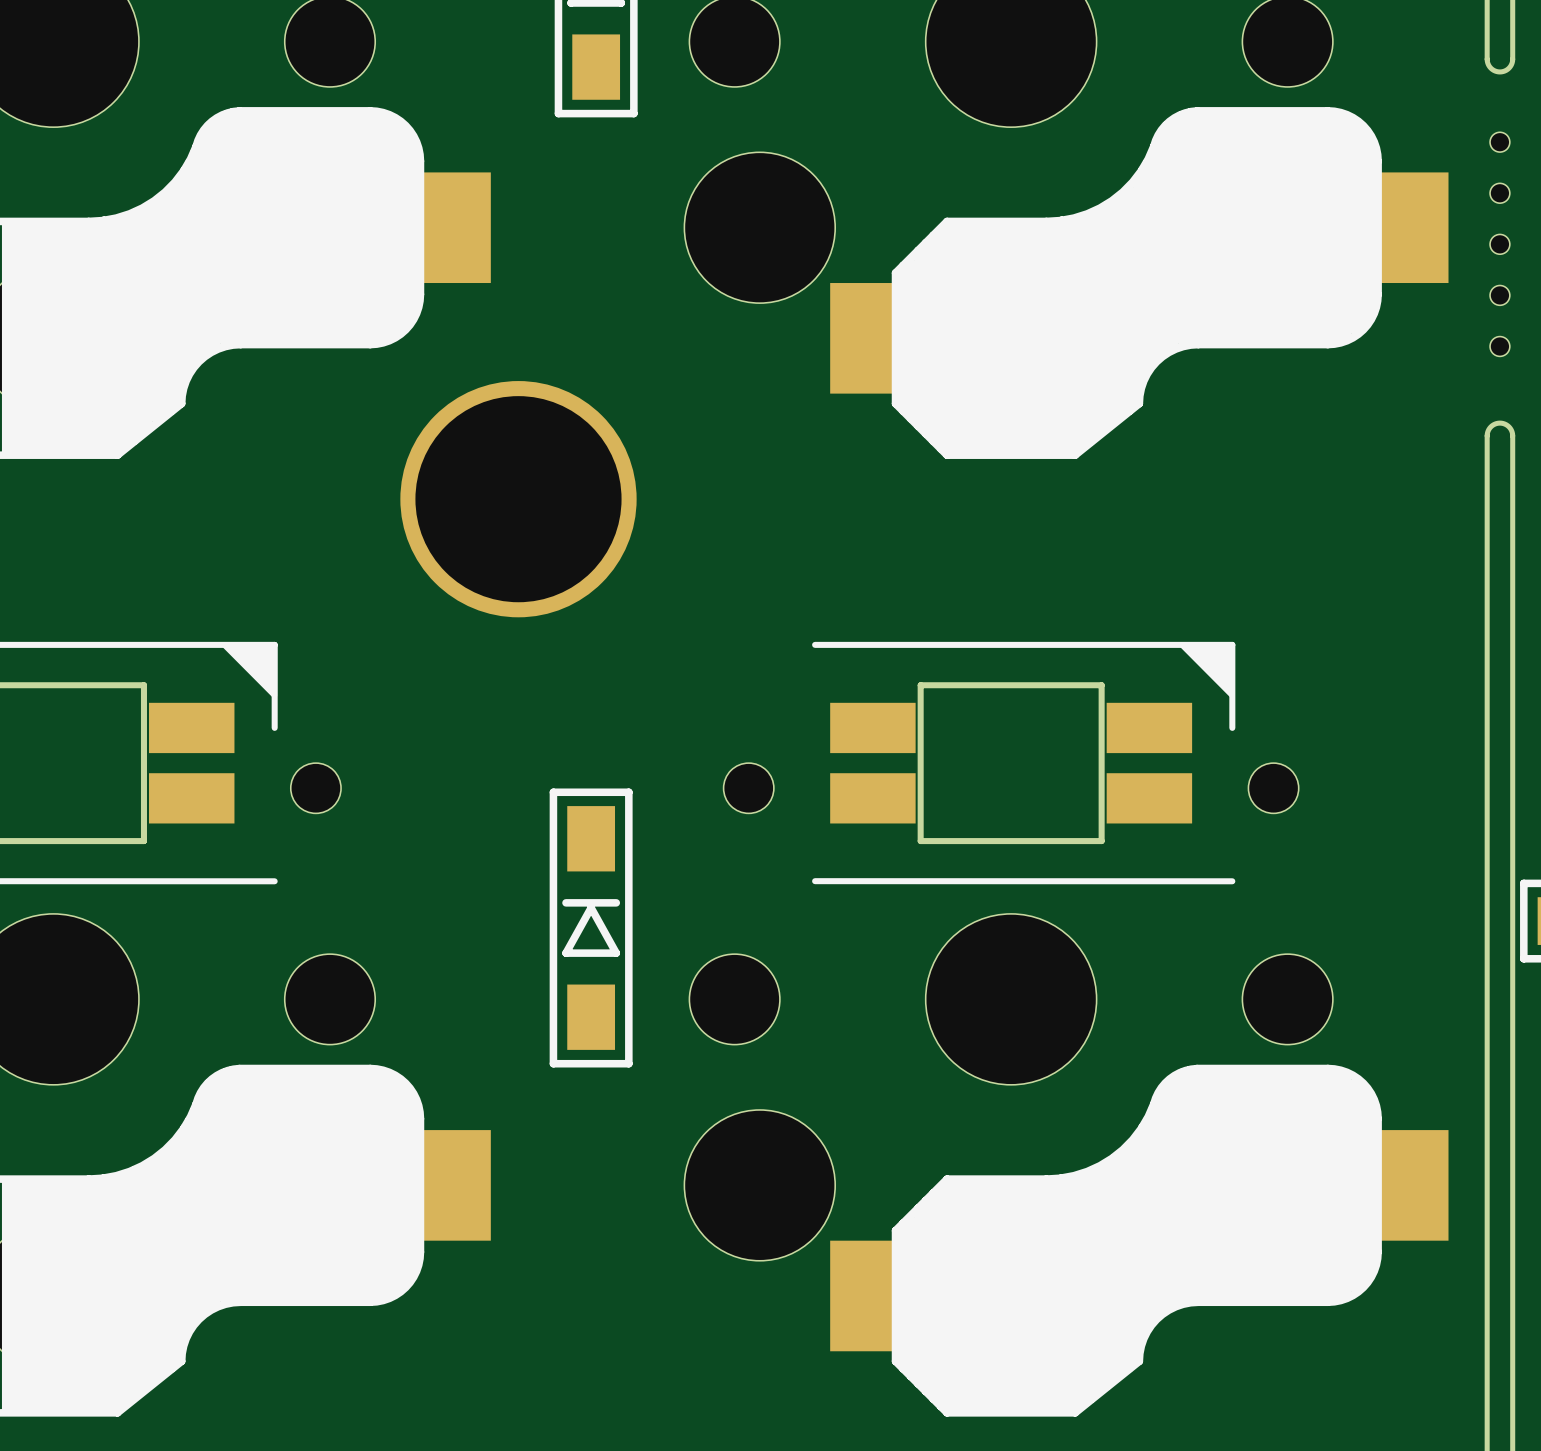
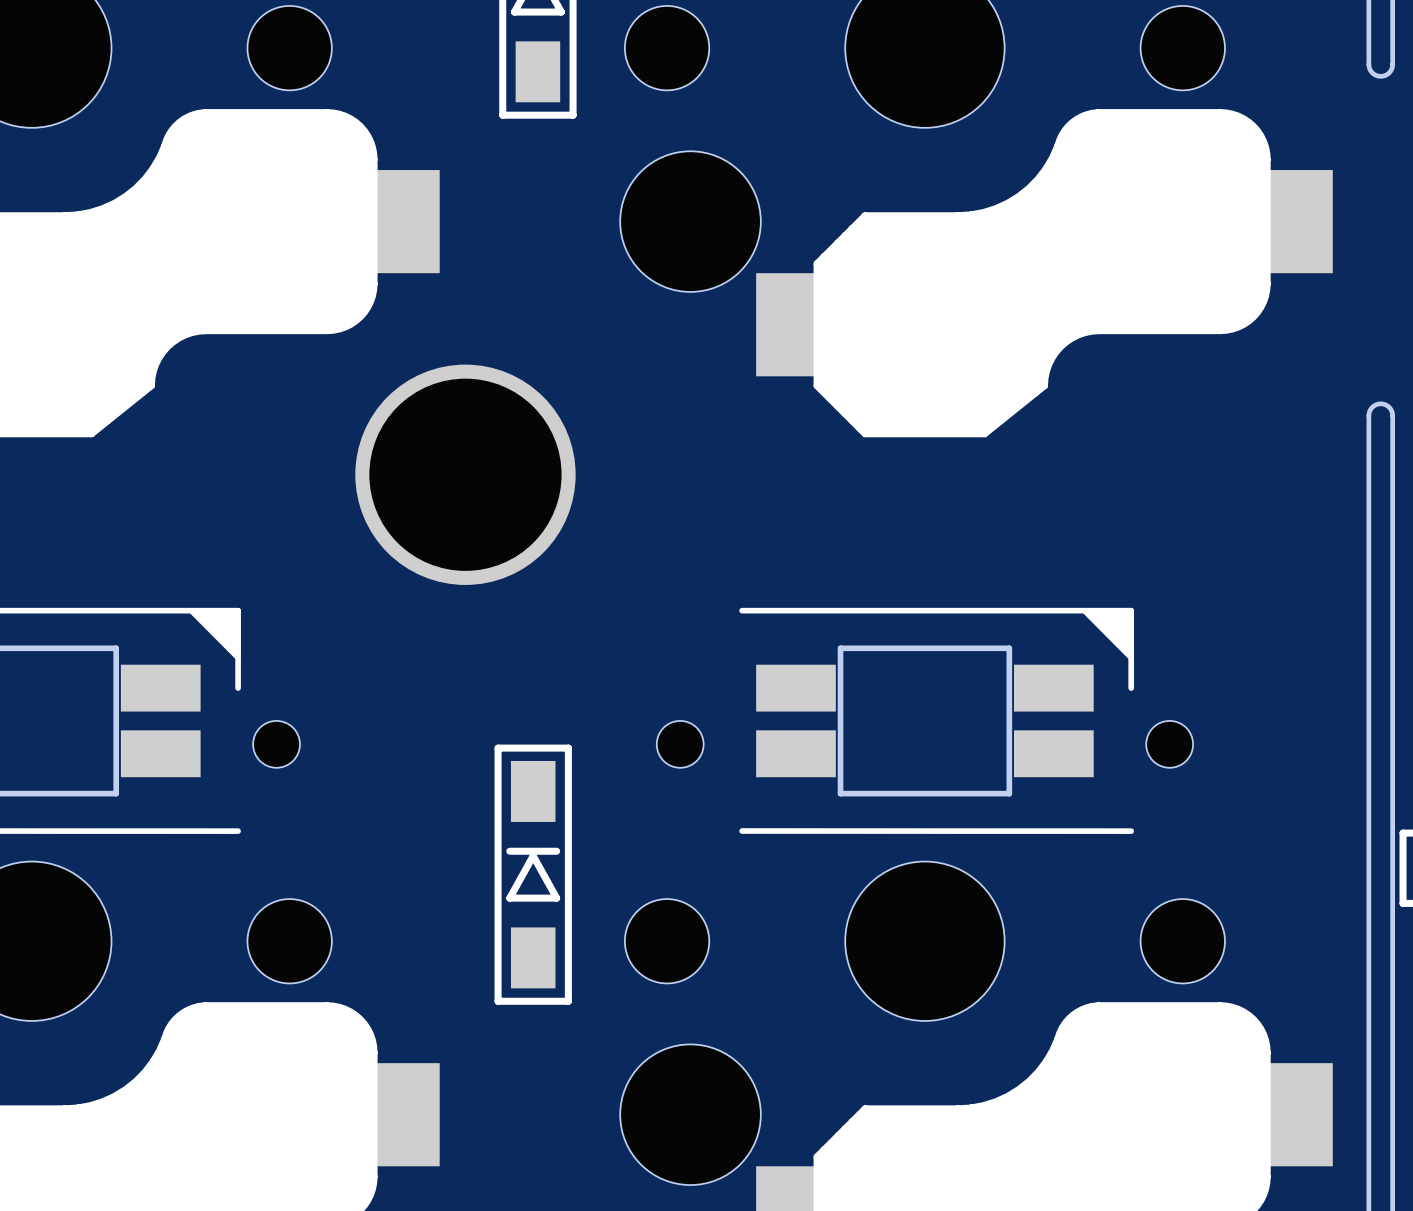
part: (1499, 142) -> none
part: (1499, 193) -> none
part: (1499, 244) -> none
part: (1499, 295) -> none
part: (1499, 346) -> none

